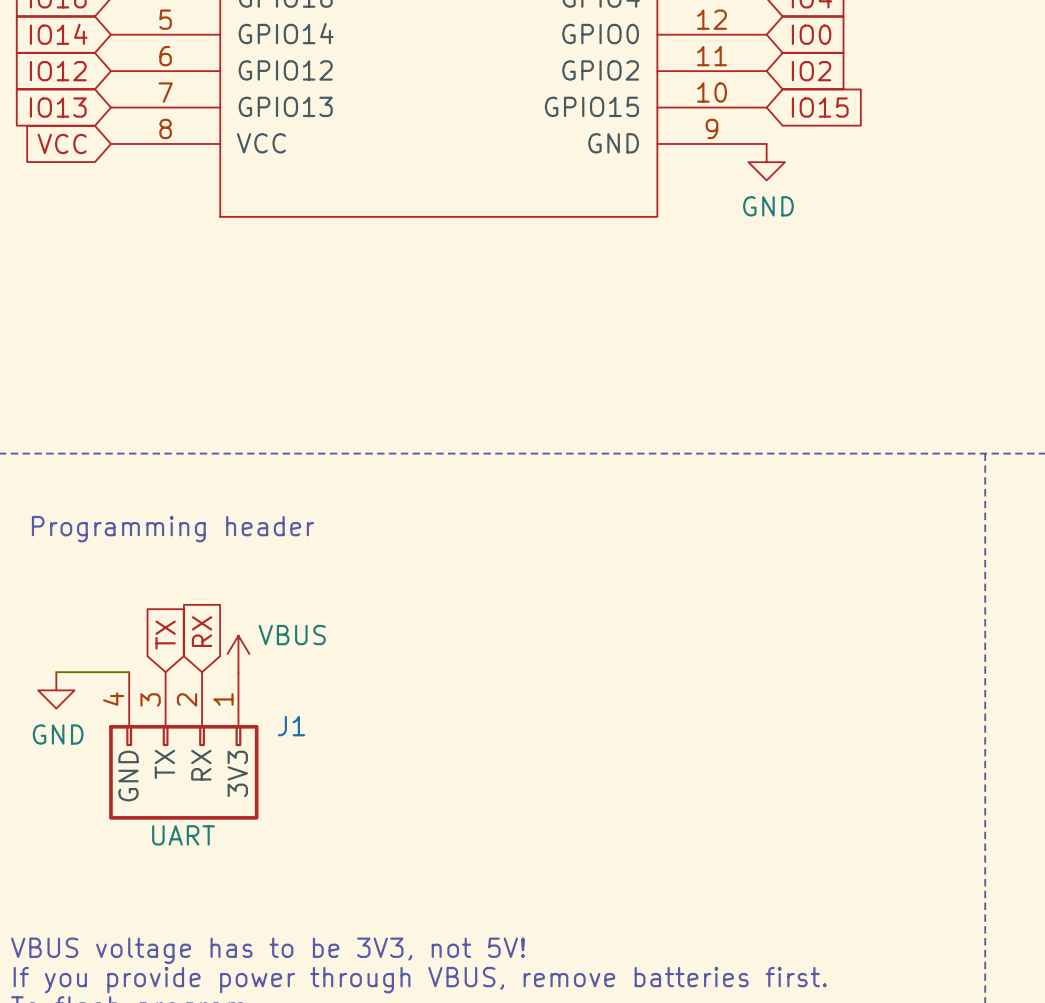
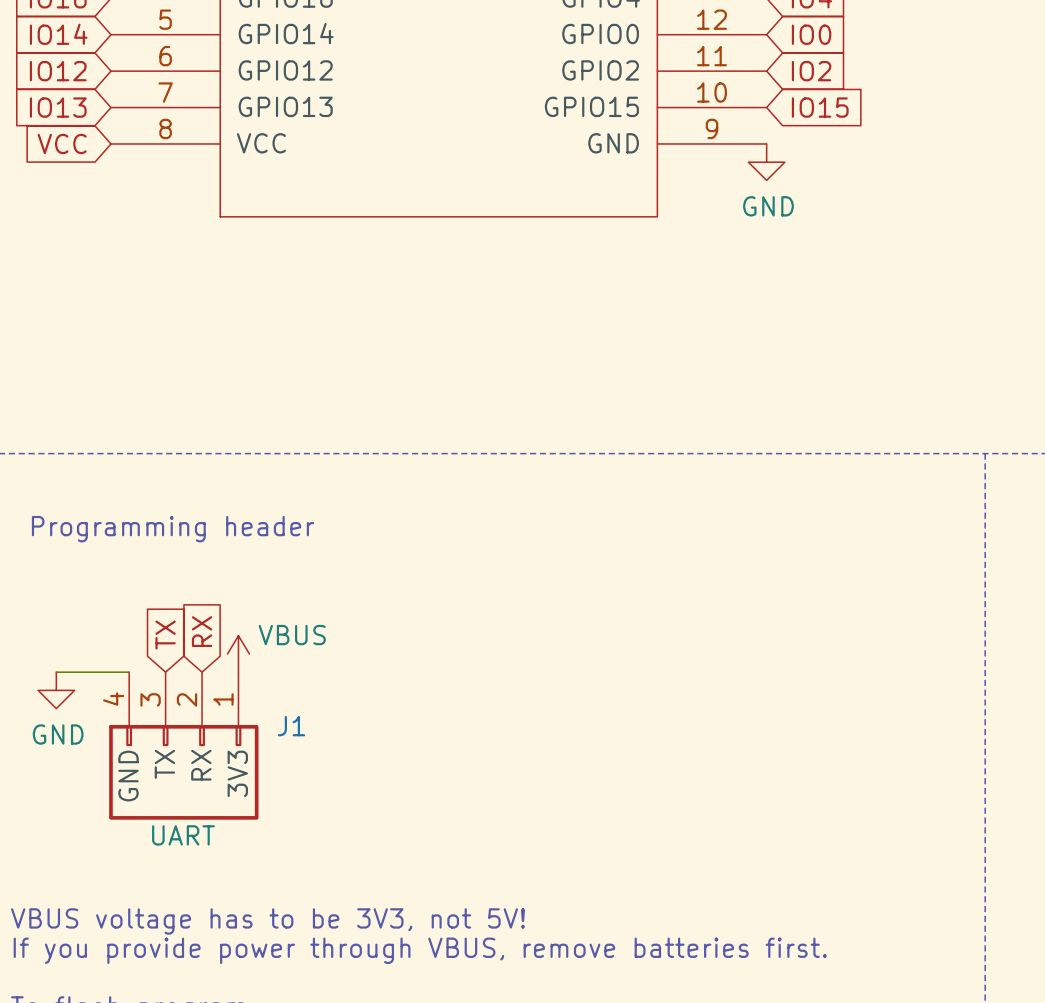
text: none -> VBUS voltage has to be 3V3, not 5V! (268, 921)
text: VBUS voltage has to be 3V3, not 5V! (268, 950) -> If you provide power through VBUS, remove batteries first. (420, 950)
text: If you provide power through VBUS, remove batteries first. (420, 980) -> none

